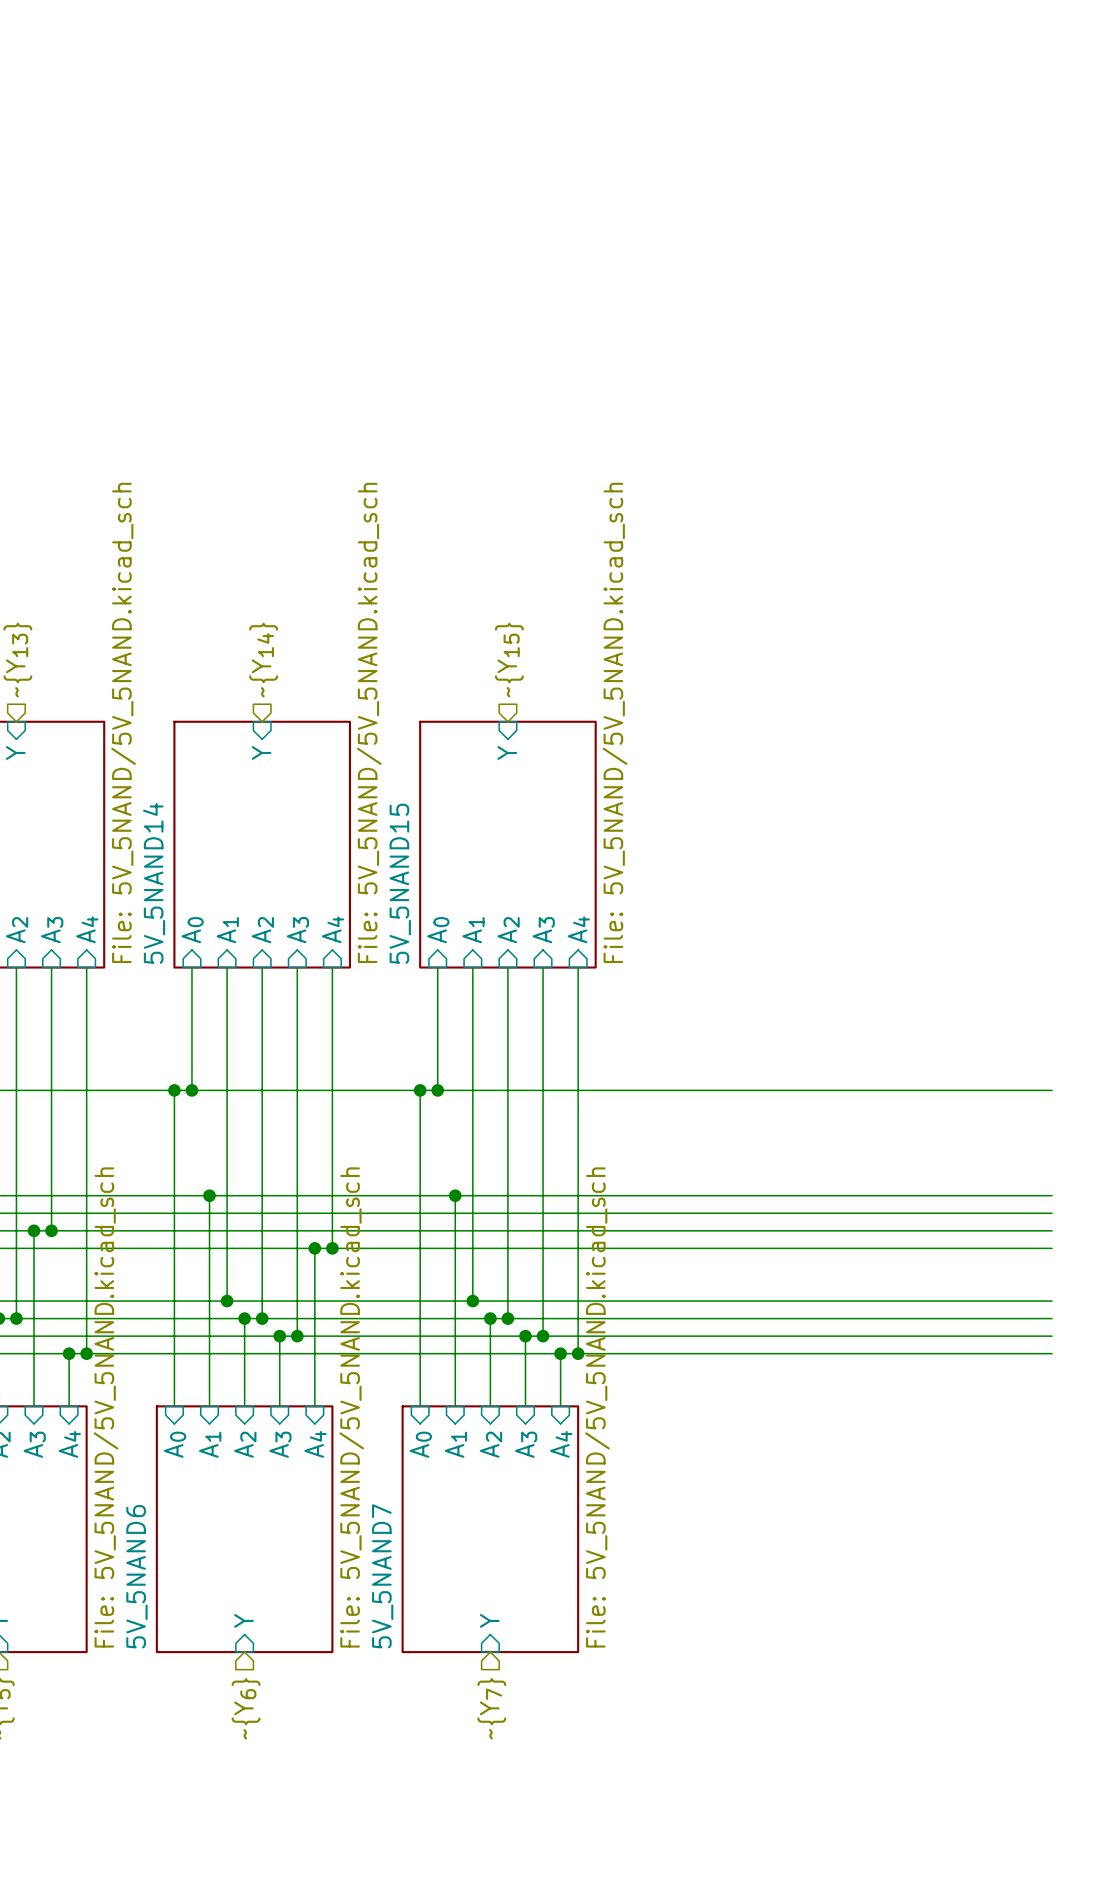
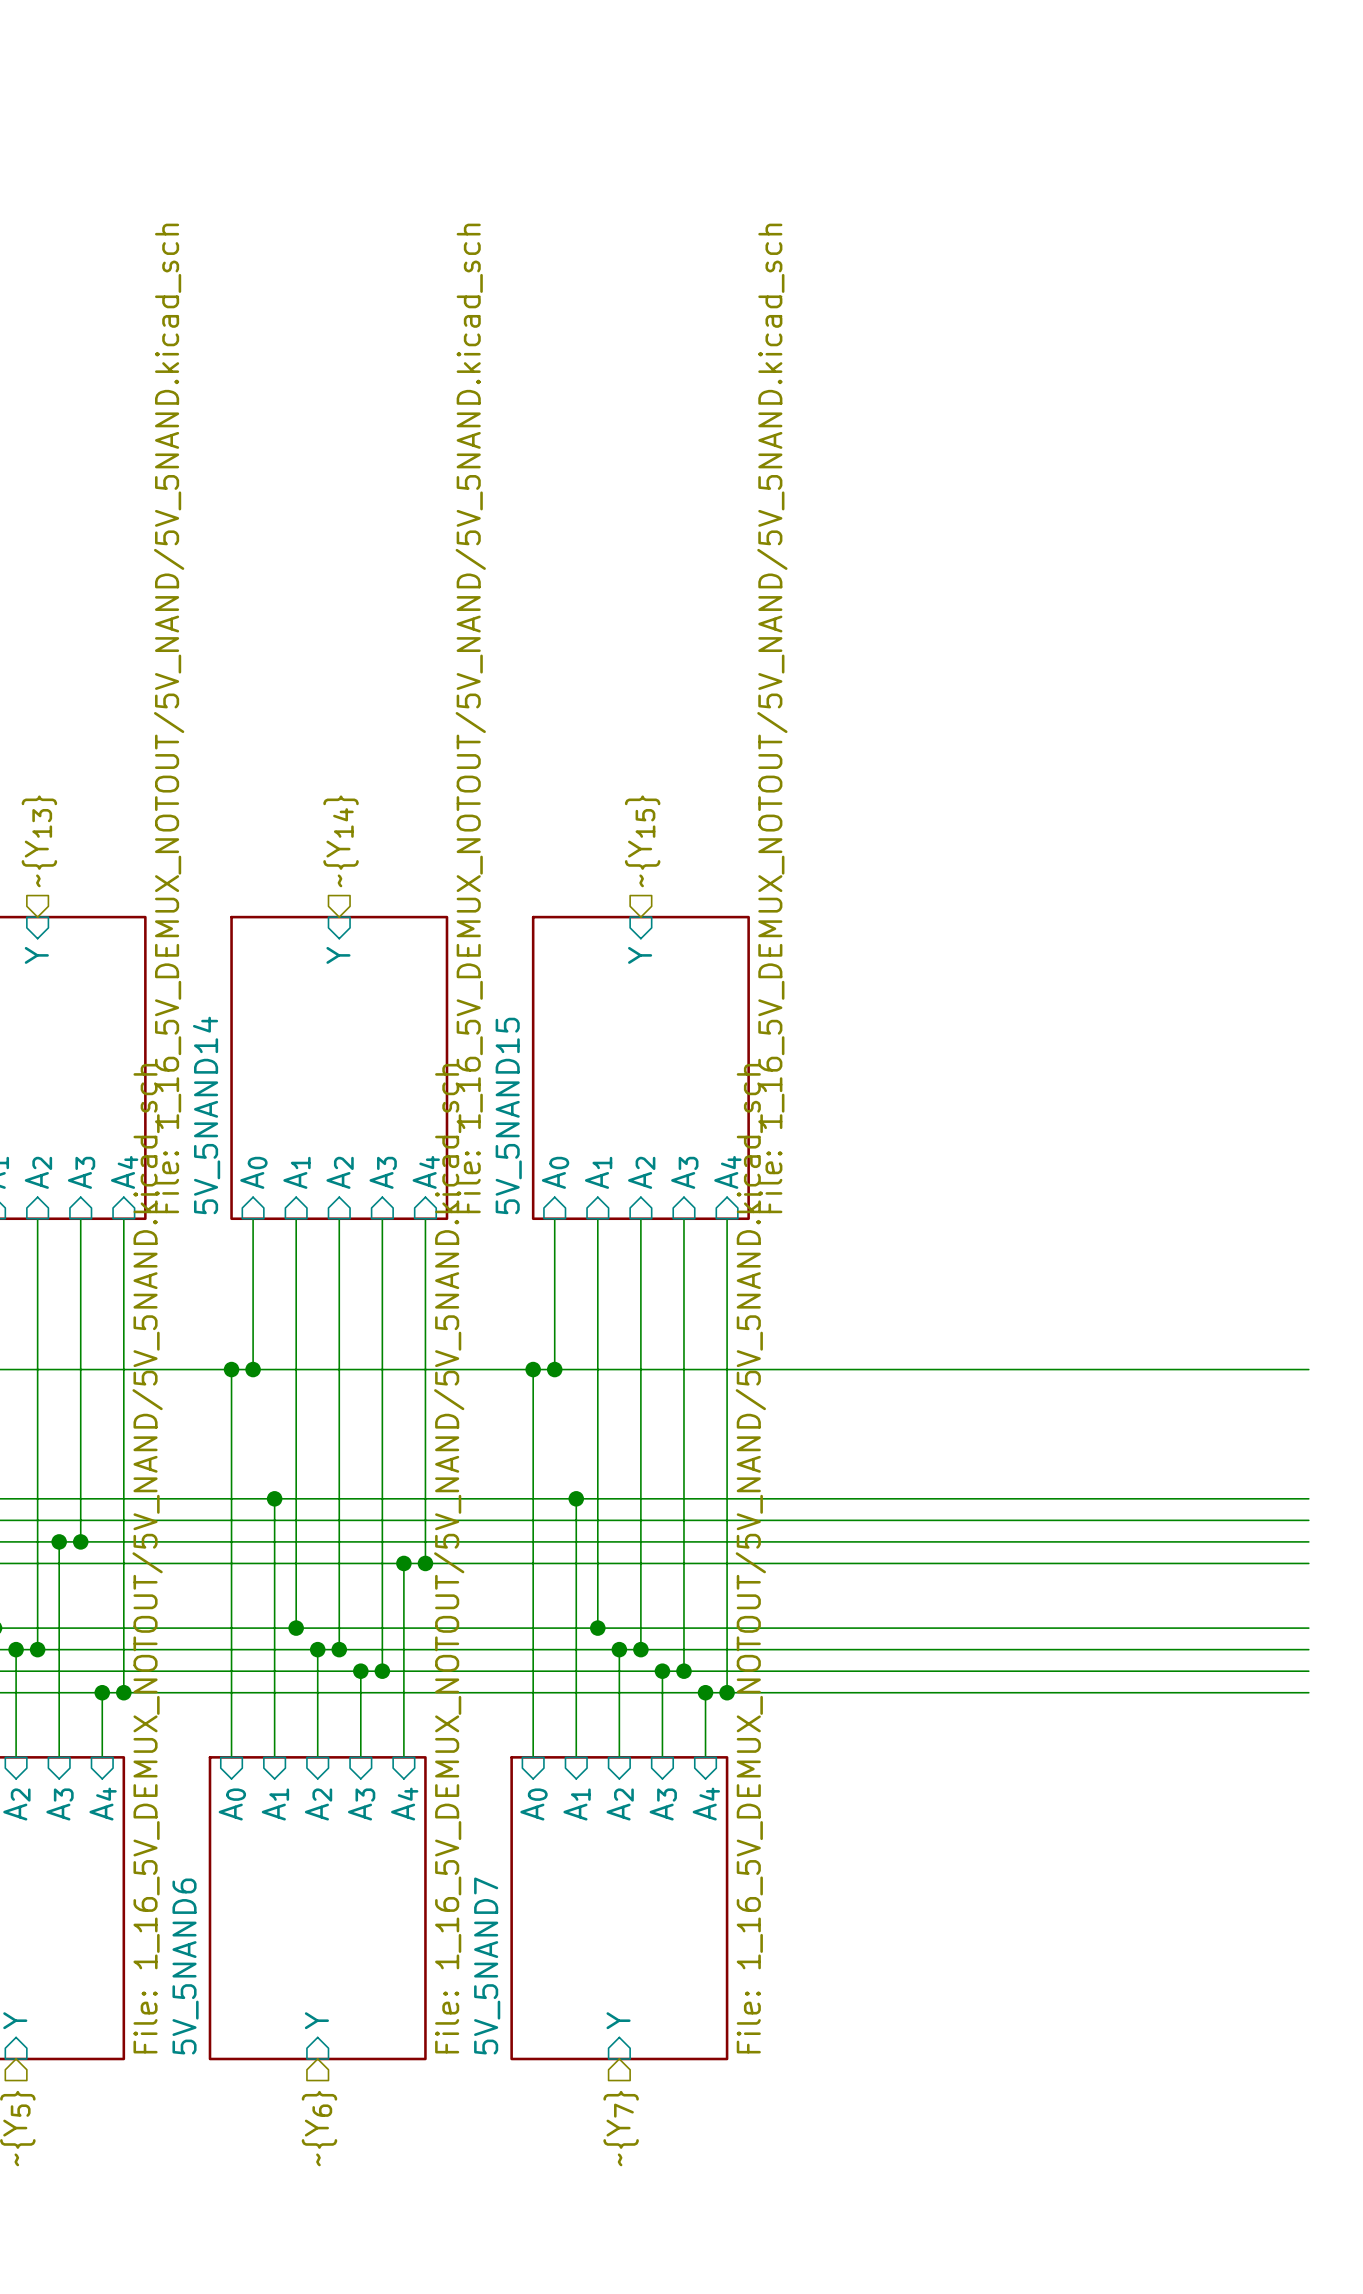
sheet value: File: 5V_5NAND/5V_5NAND.kicad_sch (123, 722) -> File: 1_16_5V_DEMUX_NOTOUT/5V_NAND/5V_5NAND.kicad_sch (169, 718)
sheet 5V_5NAND14 value: File: 5V_5NAND/5V_5NAND.kicad_sch (369, 722) -> File: 1_16_5V_DEMUX_NOTOUT/5V_NAND/5V_5NAND.kicad_sch (470, 718)
sheet 5V_5NAND15 value: File: 5V_5NAND/5V_5NAND.kicad_sch (615, 722) -> File: 1_16_5V_DEMUX_NOTOUT/5V_NAND/5V_5NAND.kicad_sch (772, 718)
sheet value: File: 5V_5NAND/5V_5NAND.kicad_sch (106, 1407) -> File: 1_16_5V_DEMUX_NOTOUT/5V_NAND/5V_5NAND.kicad_sch (147, 1558)
sheet 5V_5NAND6 value: File: 5V_5NAND/5V_5NAND.kicad_sch (351, 1407) -> File: 1_16_5V_DEMUX_NOTOUT/5V_NAND/5V_5NAND.kicad_sch (449, 1558)
sheet 5V_5NAND7 value: File: 5V_5NAND/5V_5NAND.kicad_sch (597, 1407) -> File: 1_16_5V_DEMUX_NOTOUT/5V_NAND/5V_5NAND.kicad_sch (750, 1558)

